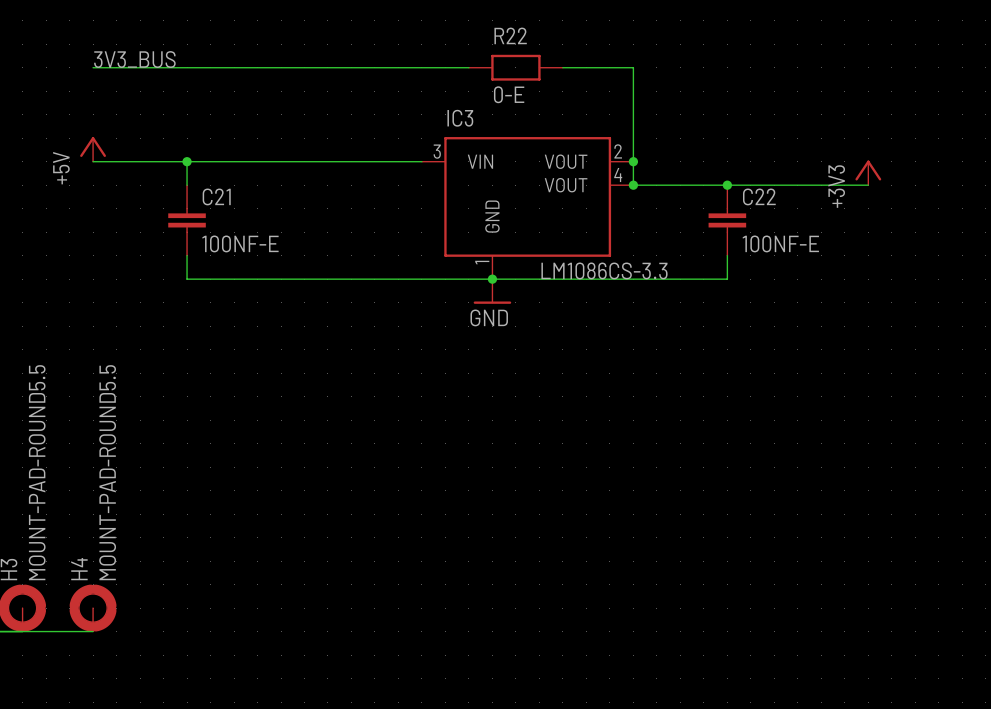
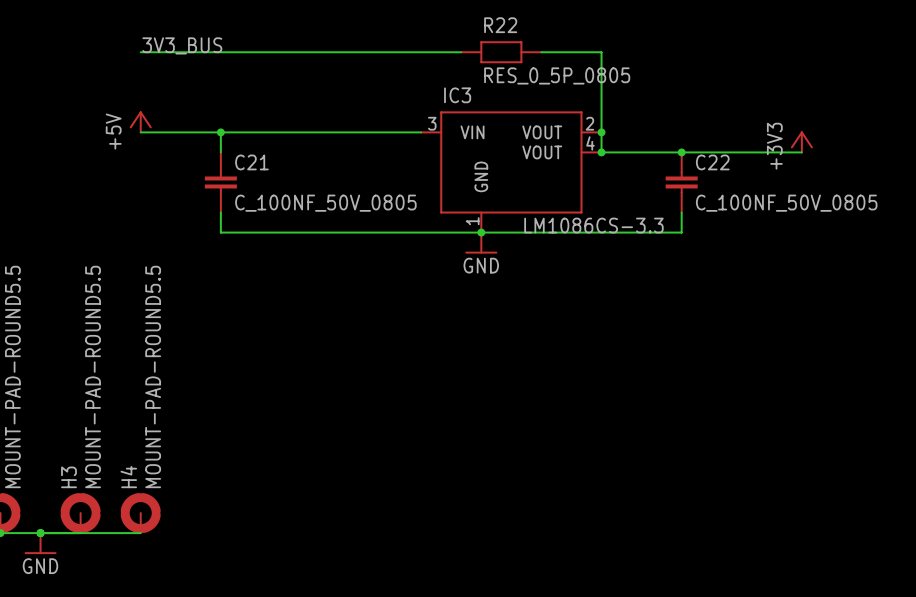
R22 value: 0-E (509, 94) -> RES_0_5P_0805 (557, 75)
C21 value: 100NF-E (240, 243) -> C_100NF_50V_0805 (325, 203)
C22 value: 100NF-E (780, 243) -> C_100NF_50V_0805 (786, 203)

